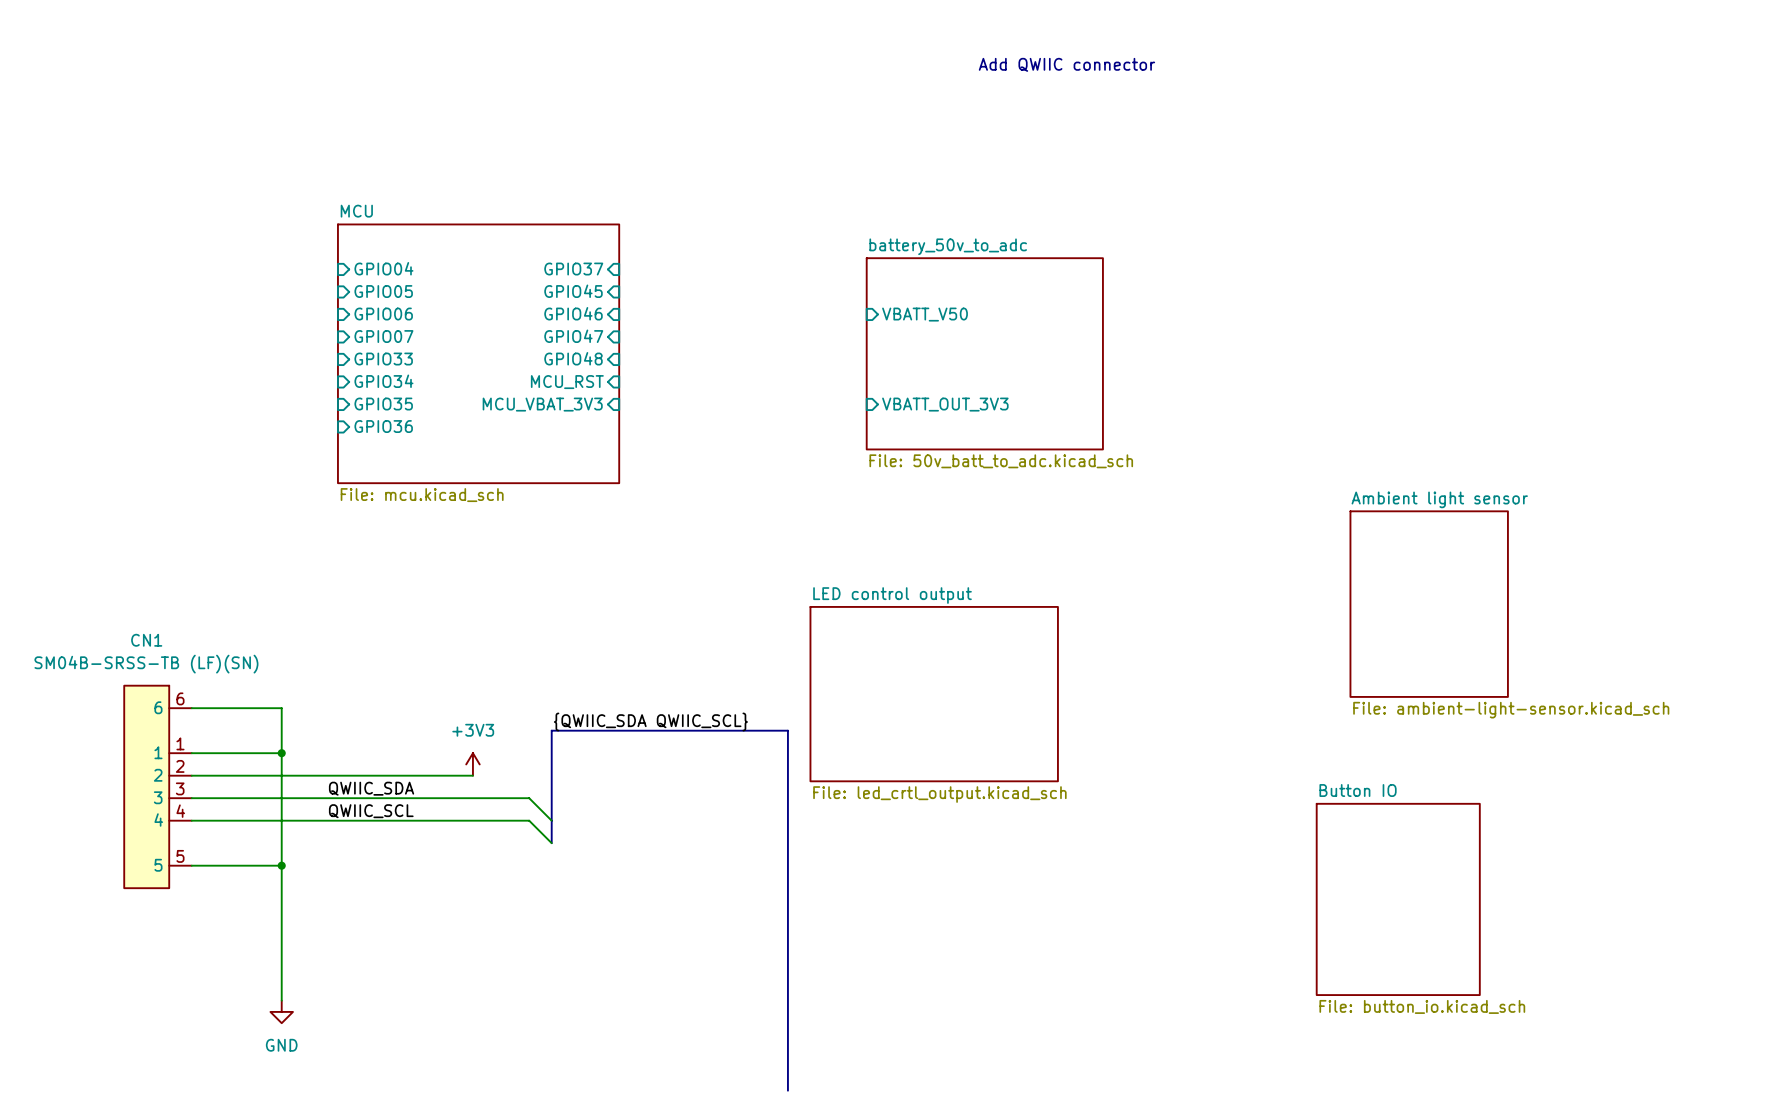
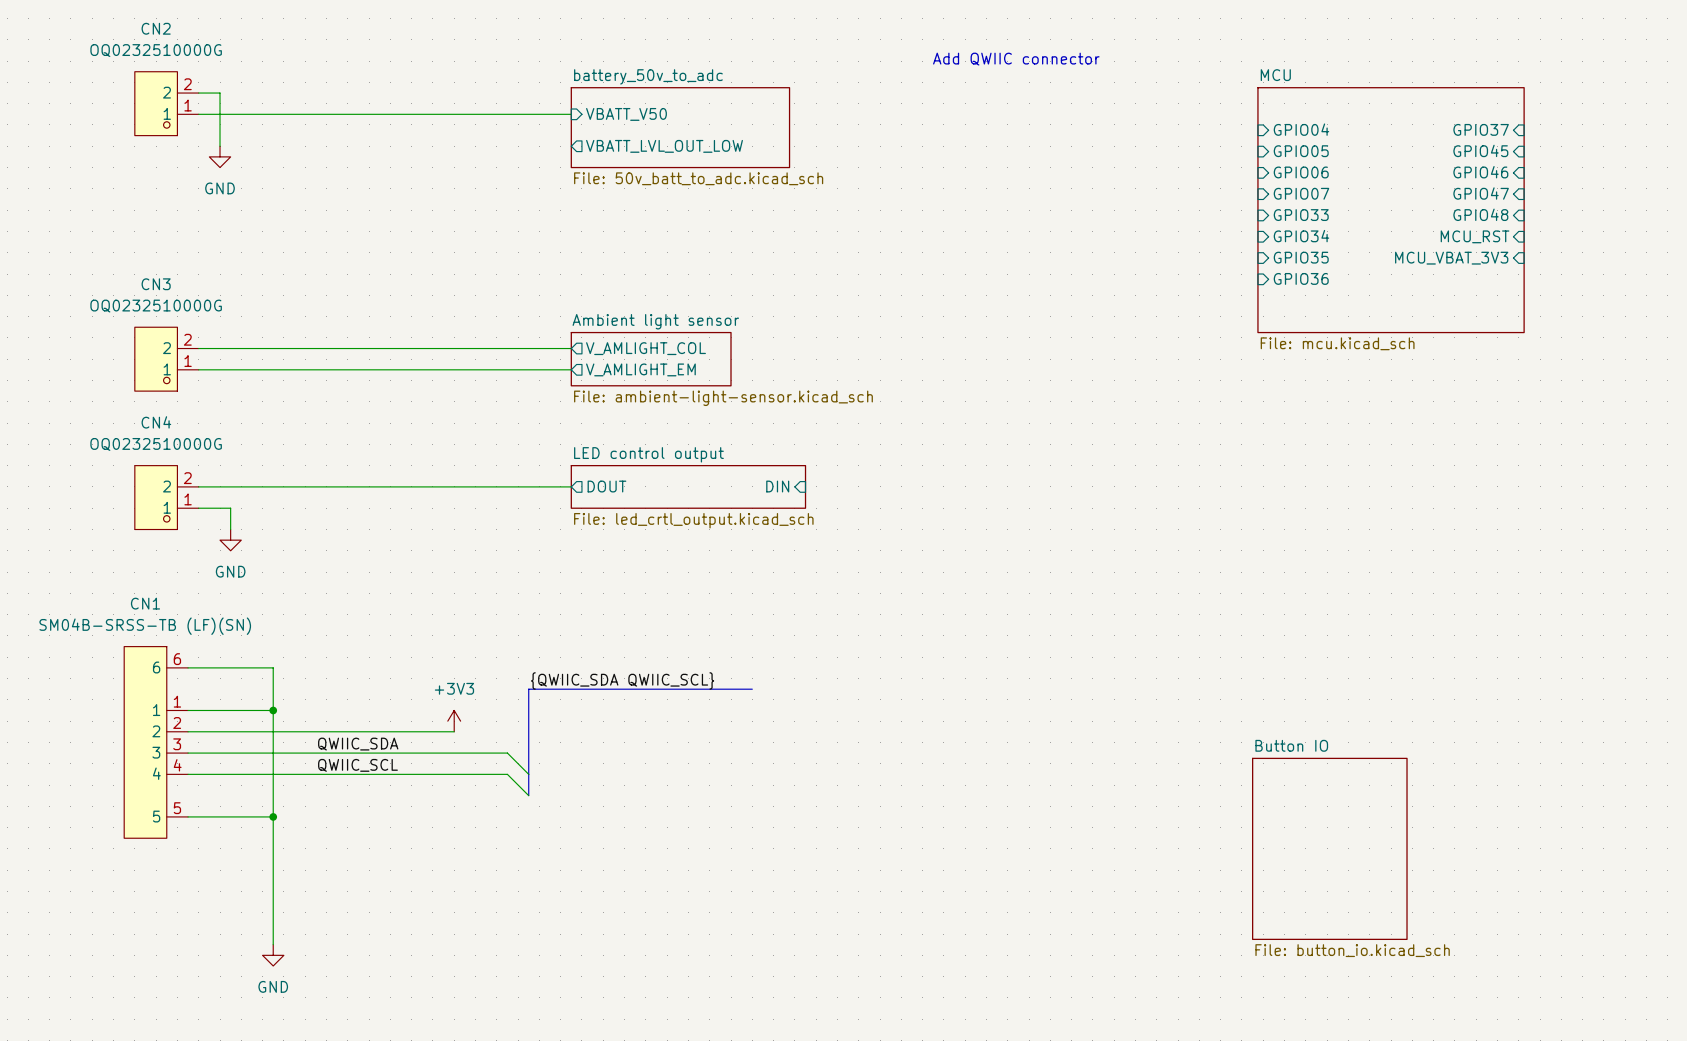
wire: none -> (198, 93) (220, 93) (220, 146)
CN2: none -> OQ0232510000G (166, 103)
wire: none -> (198, 114) (571, 114)
sheet pin: none -> VBATT_V50 (626, 114)
sheet pin: none -> GPIO04 (1301, 129)
sheet pin: none -> GPIO37 (1481, 129)
sheet pin: none -> VBATT_LVL_OUT_LOW (664, 146)
sheet pin: none -> GPIO45 (1480, 150)
sheet pin: none -> GPIO05 (1301, 151)
power symbol: none -> GND (220, 156)
sheet pin: none -> GPIO06 (1301, 172)
sheet pin: none -> GPIO46 (1480, 172)
sheet pin: none -> GPIO47 (1481, 193)
sheet pin: none -> GPIO07 (1301, 193)
sheet MCU: none -> File: mcu.kicad_sch (1391, 210)
sheet pin: none -> GPIO33 (1301, 215)
sheet pin: none -> GPIO48 (1480, 214)
sheet battery_50v_to_adc name position: battery_50v_to_adc (948, 246) -> battery_50v_to_adc (648, 76)
sheet pin: none -> GPIO34 (1301, 236)
sheet pin: none -> MCU_RST (1475, 236)
sheet battery_50v_to_adc shape: [866, 257, 1104, 451] -> [570, 87, 791, 169]
sheet pin: GPIO04 (383, 268) -> none
sheet pin: GPIO37 (573, 269) -> none
sheet pin: none -> GPIO35 (1301, 257)
sheet pin: none -> MCU_VBAT_3V3 (1451, 258)
sheet pin: GPIO05 (383, 291) -> none
sheet pin: GPIO45 (573, 291) -> none
sheet pin: none -> GPIO36 (1301, 278)
sheet pin: GPIO46 (573, 313) -> none
sheet pin: GPIO06 (383, 314) -> none
sheet pin: VBATT_V50 (925, 314) -> none
sheet pin: GPIO07 (383, 336) -> none
sheet pin: GPIO47 (573, 336) -> none
sheet MCU: File: mcu.kicad_sch (478, 353) -> none
sheet pin: GPIO48 (573, 358) -> none
sheet pin: GPIO33 (383, 359) -> none
wire: none -> (198, 348) (571, 348)
sheet pin: none -> V_AMLIGHT_COL (646, 348)
CN3: none -> OQ0232510000G (166, 359)
sheet pin: GPIO34 (383, 381) -> none
sheet Ambient light sensor: none -> File: ambient-light-sensor.kicad_sch (651, 359)
sheet pin: MCU_RST (567, 382) -> none
wire: none -> (198, 369) (571, 369)
sheet pin: none -> V_AMLIGHT_EM (640, 369)
sheet pin: GPIO35 (383, 404) -> none
sheet pin: MCU_VBAT_3V3 (542, 404) -> none
sheet pin: VBATT_OUT_3V3 (945, 404) -> none
sheet pin: GPIO36 (383, 426) -> none
sheet battery_50v_to_adc value position: File: 50v_batt_to_adc.kicad_sch (1001, 461) -> File: 50v_batt_to_adc.kicad_sch (698, 178)
wire: none -> (198, 486) (571, 486)
sheet pin: none -> DOUT (606, 486)
sheet LED control output: none -> File: led_crtl_output.kicad_sch (688, 486)
sheet pin: none -> DIN (777, 486)
CN4: none -> OQ0232510000G (166, 497)
wire: none -> (198, 508) (230, 508) (230, 529)
power symbol: none -> GND (230, 540)
sheet Ambient light sensor: File: ambient-light-sensor.kicad_sch (1429, 604) -> none
sheet LED control output: File: led_crtl_output.kicad_sch (934, 694) -> none
bus: (787, 730) (787, 1090) -> none

